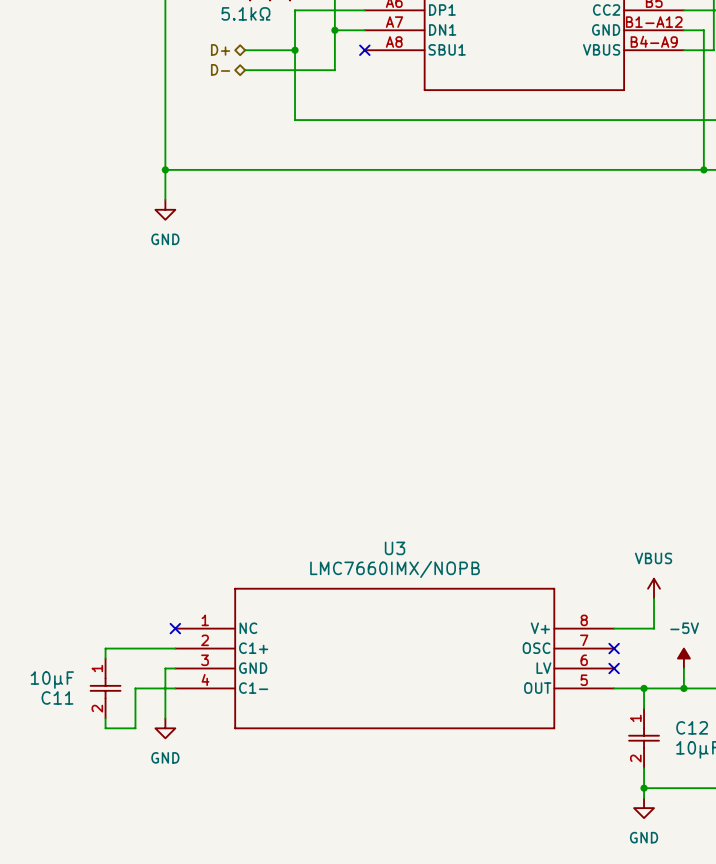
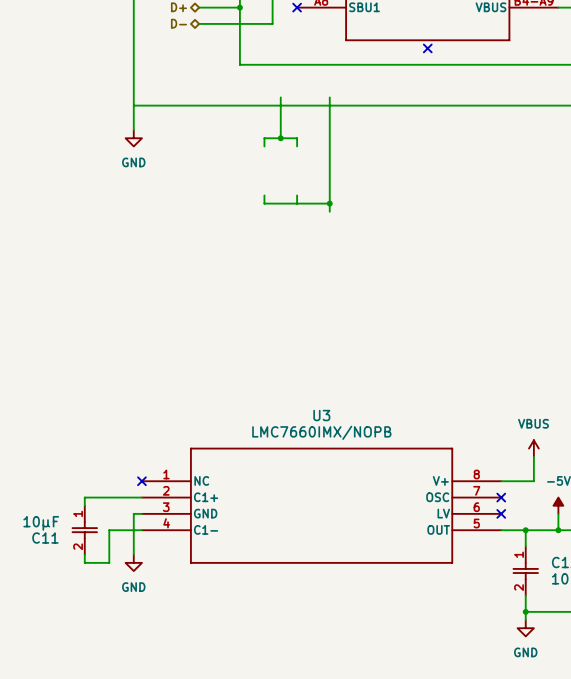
no-connect mark: none -> (427, 48)
wire: none -> (280, 97) (280, 138)
wire: none -> (329, 97) (329, 211)
junction: (165, 169) -> none
junction: none -> (280, 138)
wire: none -> (264, 146) (264, 138) (297, 138) (297, 146)
wire: none -> (264, 195) (264, 203) (329, 203)
wire: none -> (297, 195) (297, 203)
junction: none -> (329, 203)

